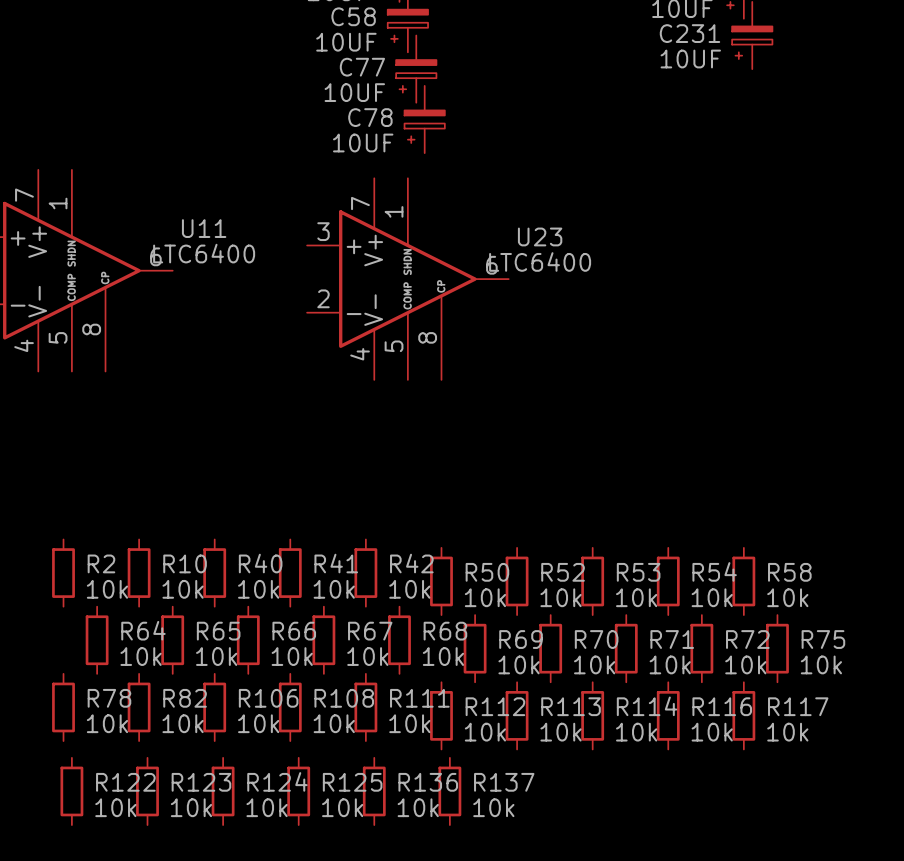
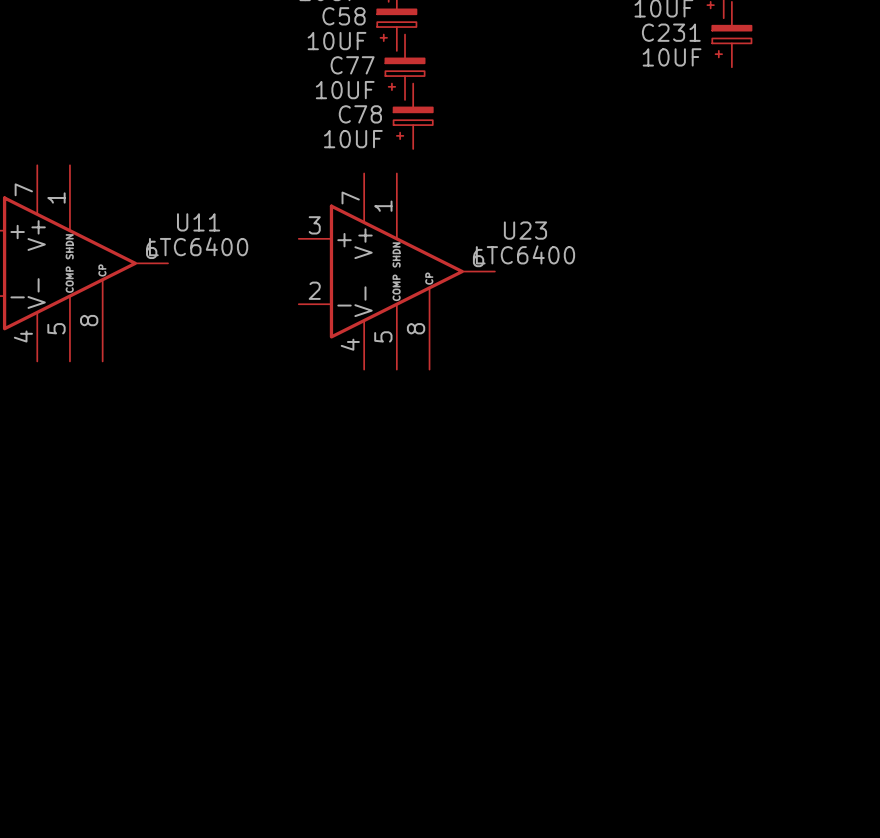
R2: 10k (63, 573) -> none
R10: 10k (139, 573) -> none
R40: 10k (214, 573) -> none
R41: 10k (290, 573) -> none
R42: 10k (365, 573) -> none
R50: 10k (441, 581) -> none
R52: 10k (517, 581) -> none
R53: 10k (592, 581) -> none
R54: 10k (668, 581) -> none
R58: 10k (743, 581) -> none
R64: 10k (97, 640) -> none
R65: 10k (172, 640) -> none
R66: 10k (248, 640) -> none
R67: 10k (323, 640) -> none
R68: 10k (399, 640) -> none
R69: 10k (475, 648) -> none
R70: 10k (550, 648) -> none
R71: 10k (626, 648) -> none
R72: 10k (701, 648) -> none
R75: 10k (777, 648) -> none
R78: 10k (63, 707) -> none
R82: 10k (139, 707) -> none
R106: 10k (214, 707) -> none
R108: 10k (290, 707) -> none
R111: 10k (365, 707) -> none
R112: 10k (441, 715) -> none
R113: 10k (517, 715) -> none
R114: 10k (592, 715) -> none
R116: 10k (668, 715) -> none
R117: 10k (743, 715) -> none
R122: 10k (71, 791) -> none
R123: 10k (147, 791) -> none
R124: 10k (223, 791) -> none
R125: 10k (298, 791) -> none
R136: 10k (374, 791) -> none
R137: 10k (449, 791) -> none

